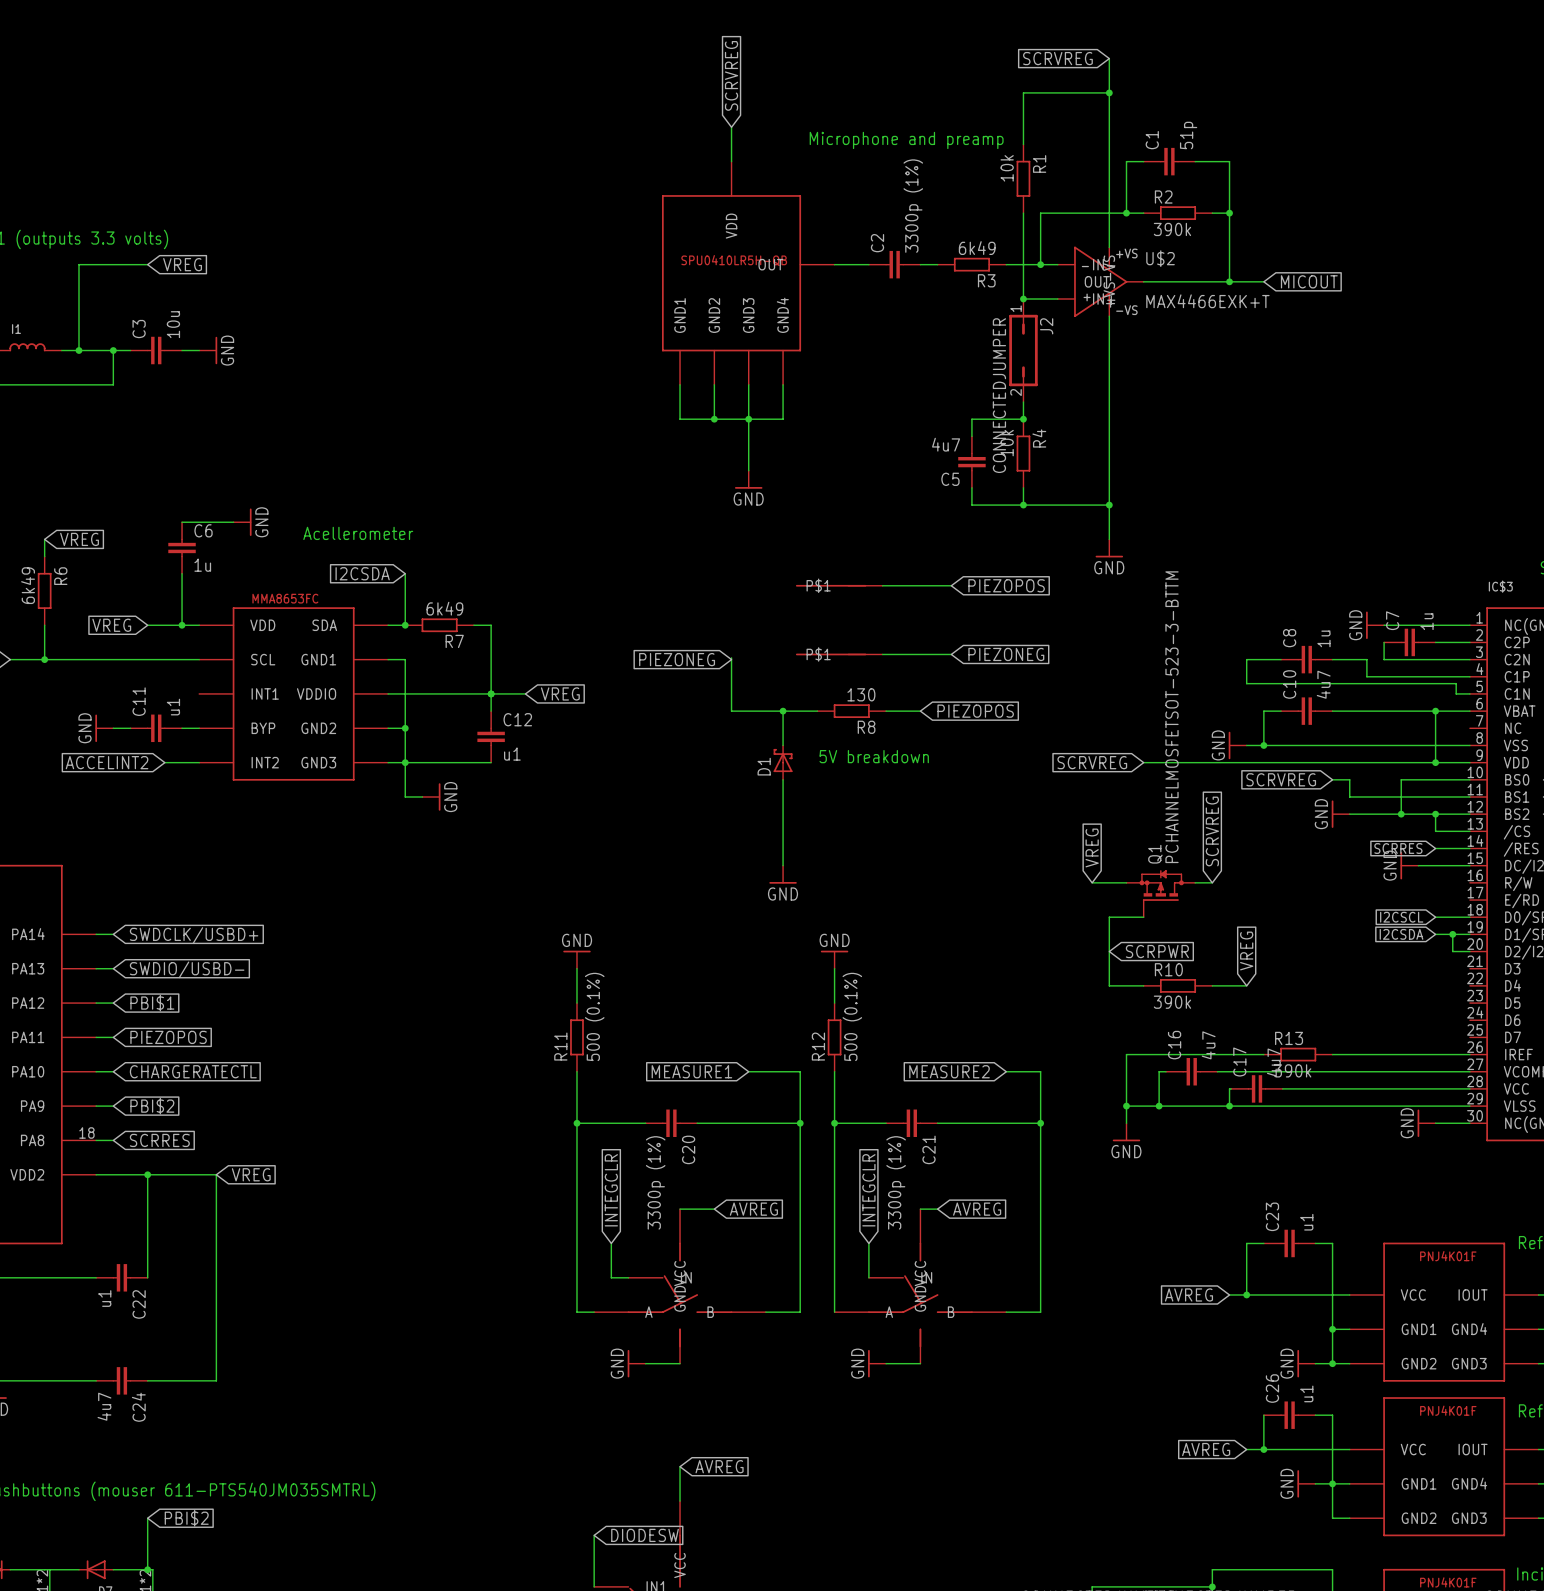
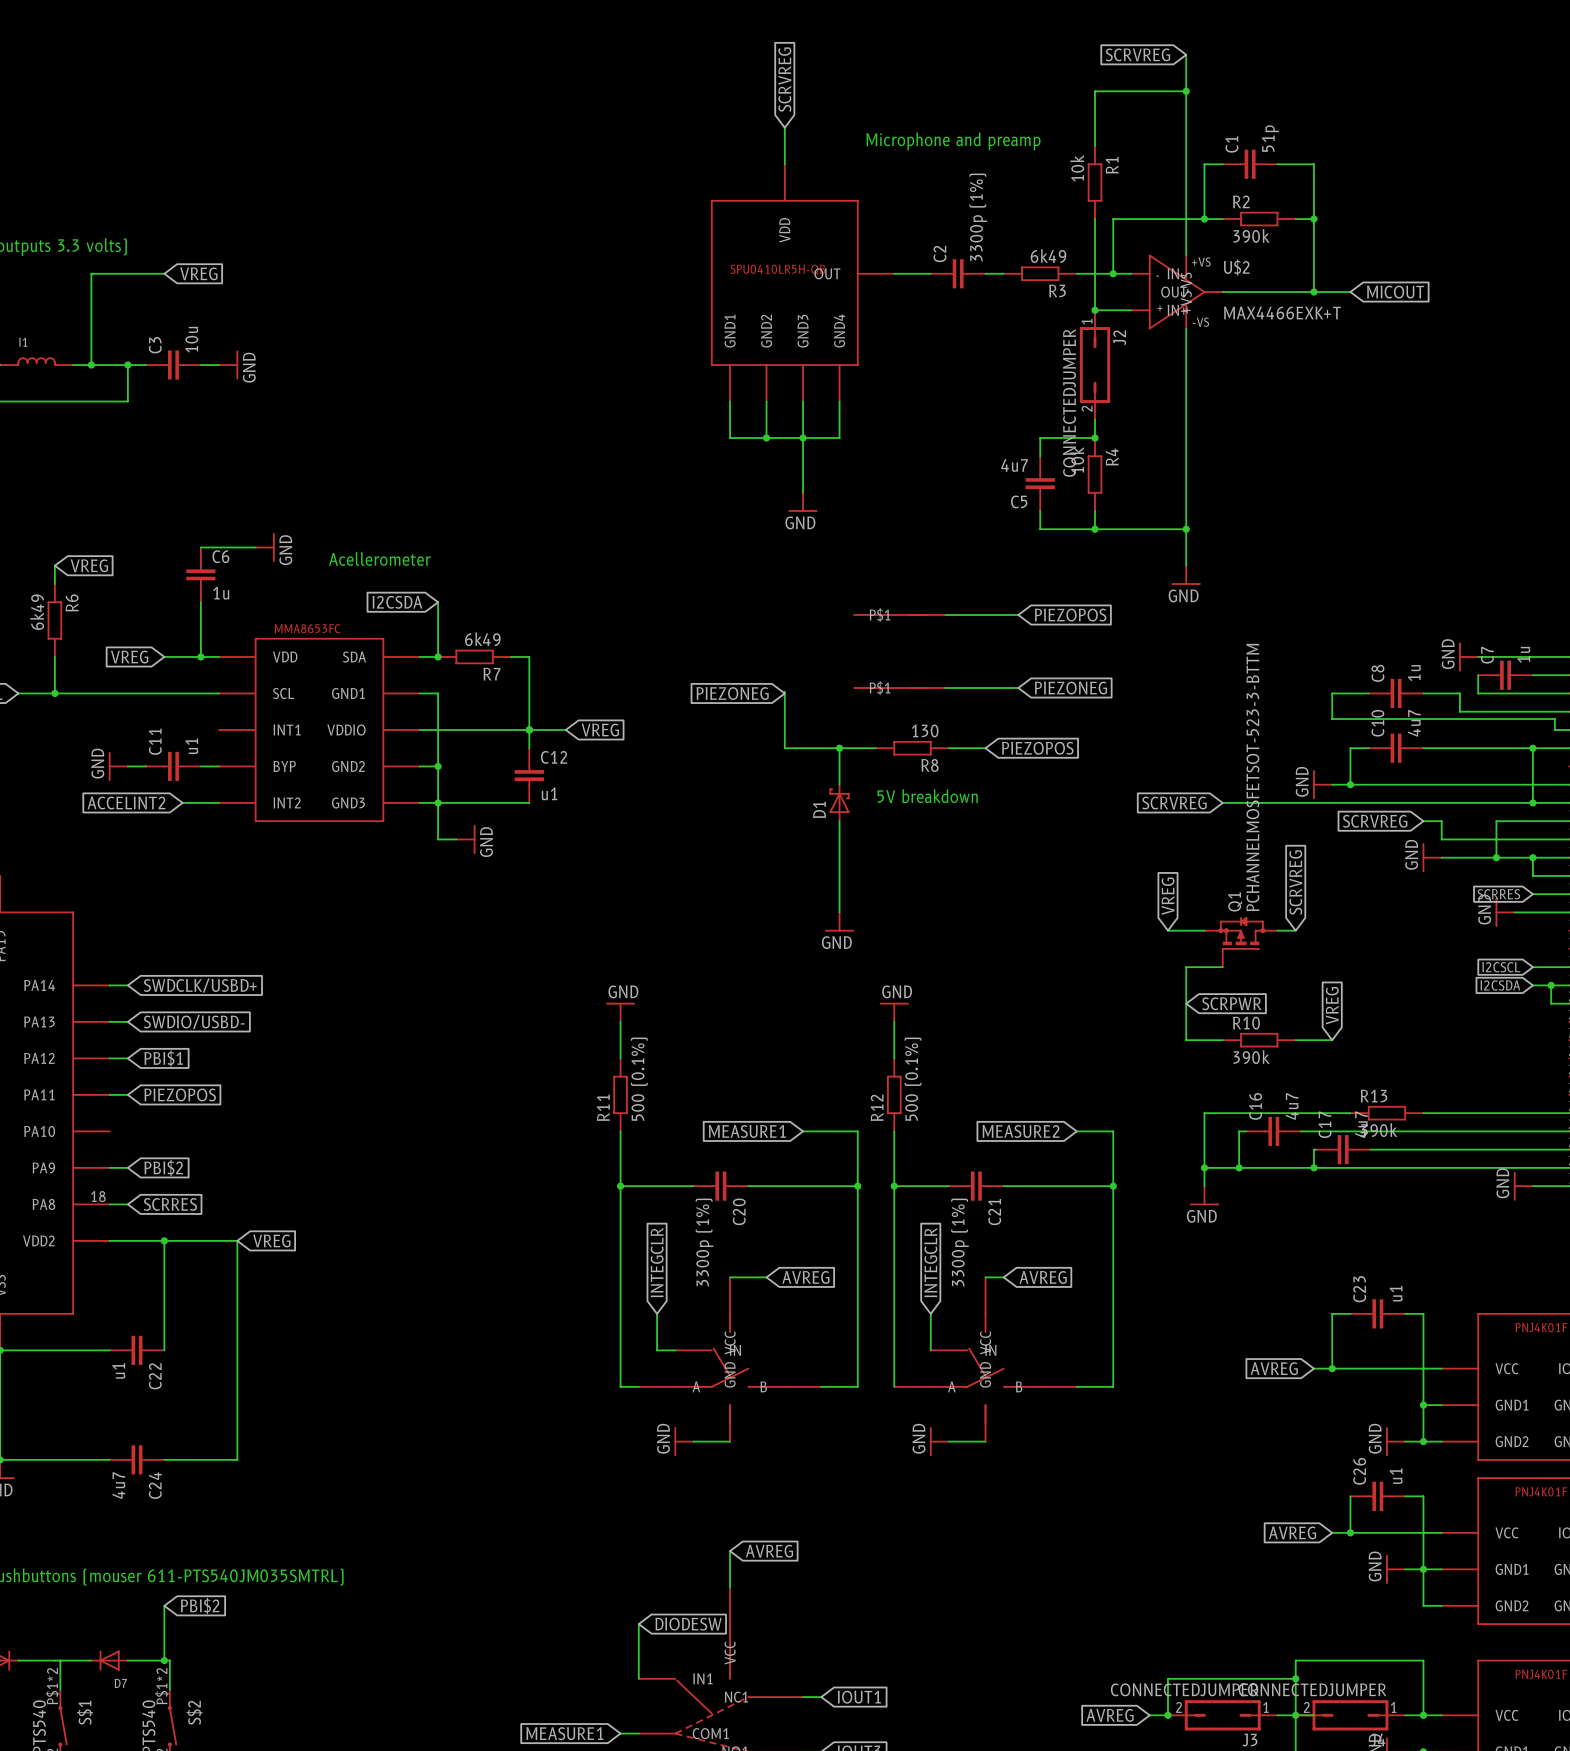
wire: (96, 1071) (113, 1071) -> none
global label: CHARGERATECTL (193, 1071) -> none

